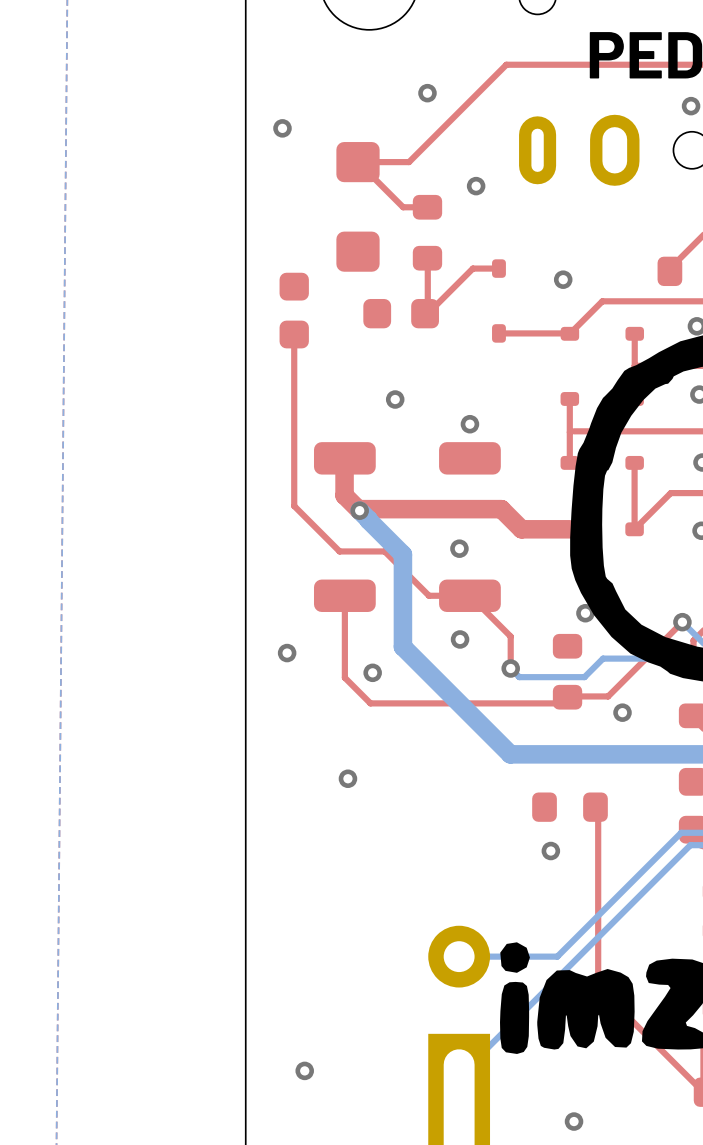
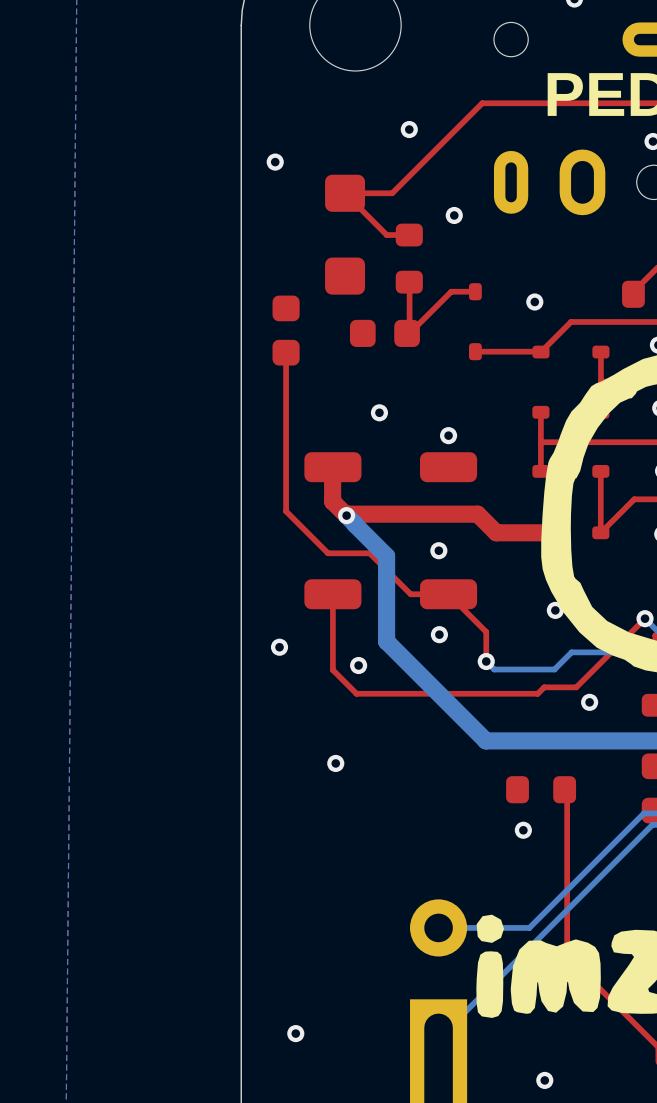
part: (567, 671) -> none

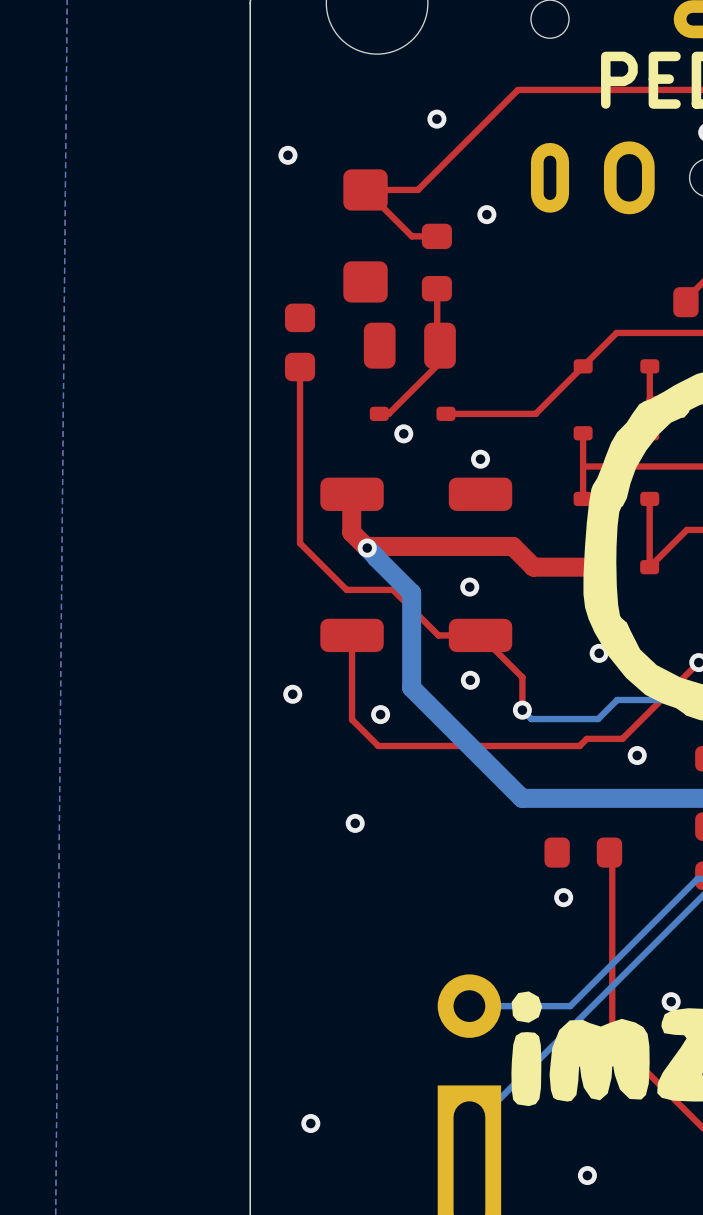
top track: (475, 291) (451, 291) (409, 333) -> none
via: (534, 302) -> none
part footprint: [349, 319, 420, 347] -> [363, 322, 456, 369]
part rotation: 0° (475, 321) -> 90° clockwise (412, 413)
part position: (475, 321) -> (412, 413)
top track: none -> (440, 345) (440, 362) (388, 413) (379, 413)
top track: (537, 351) (475, 351) -> none
top track: none -> (583, 366) (535, 413) (445, 413)
via: none -> (671, 1001)

